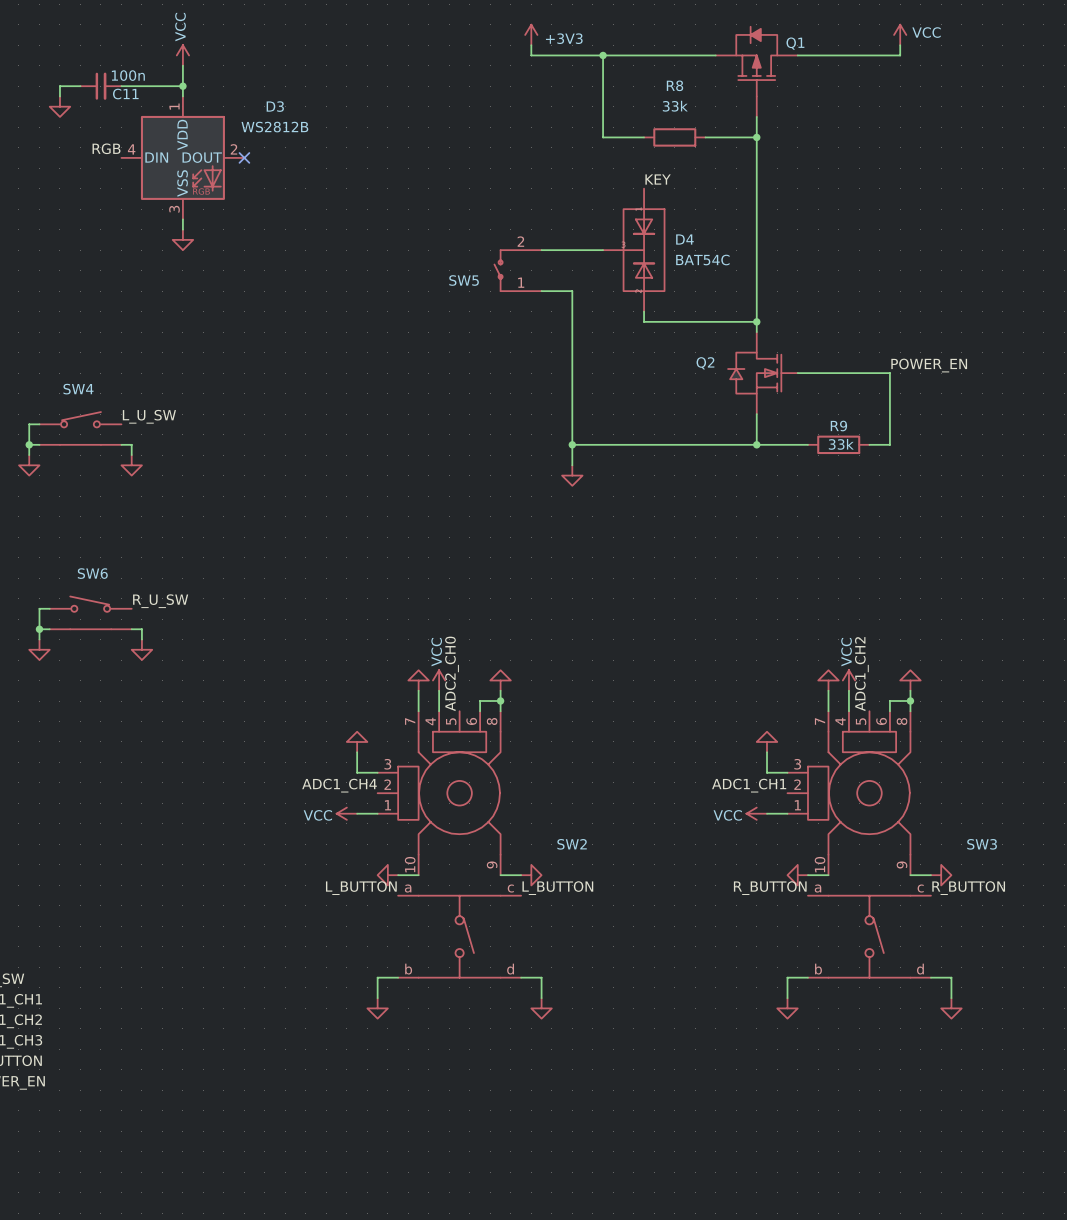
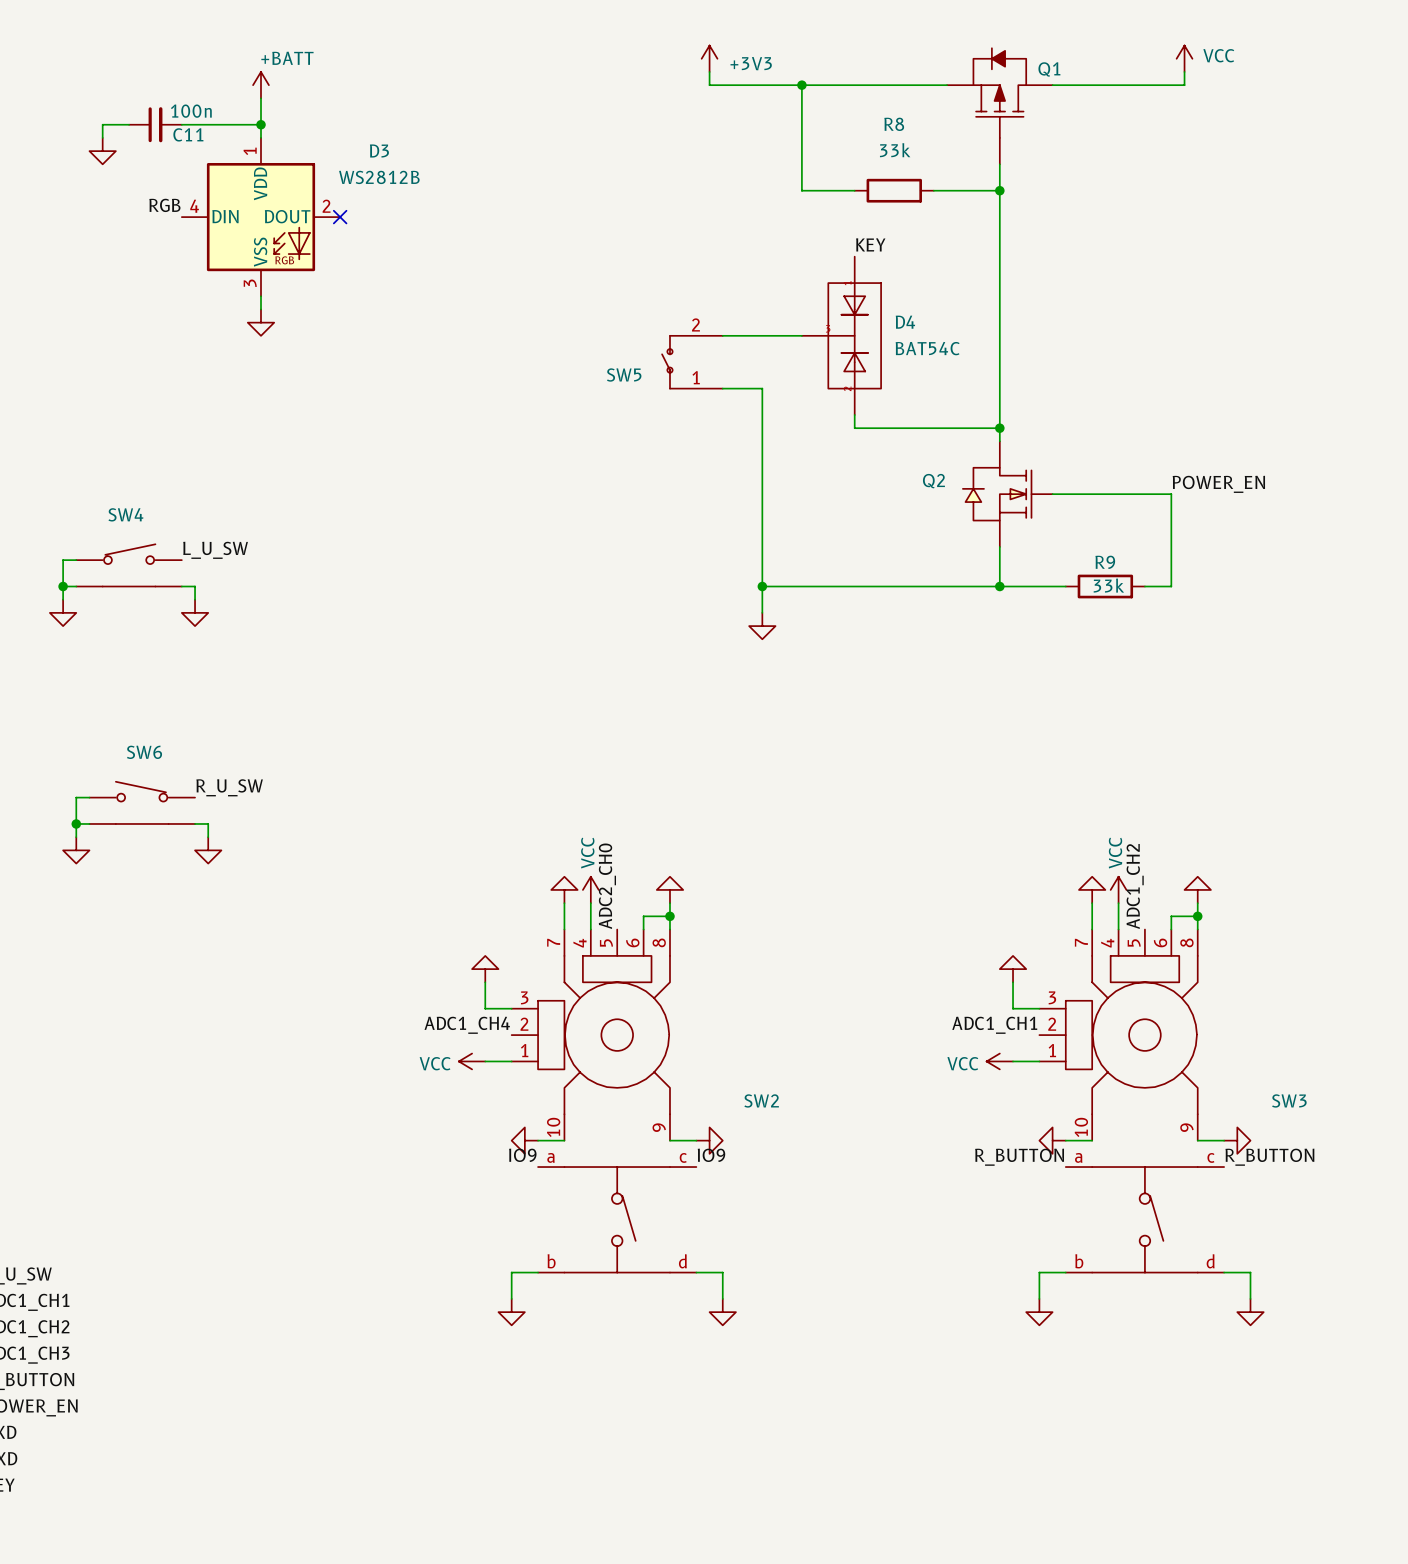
power symbol: VCC (182, 55) -> +BATT (260, 85)
label: L_BUTTON (361, 888) -> IO9 (522, 1155)
label: L_BUTTON (557, 888) -> IO9 (711, 1155)

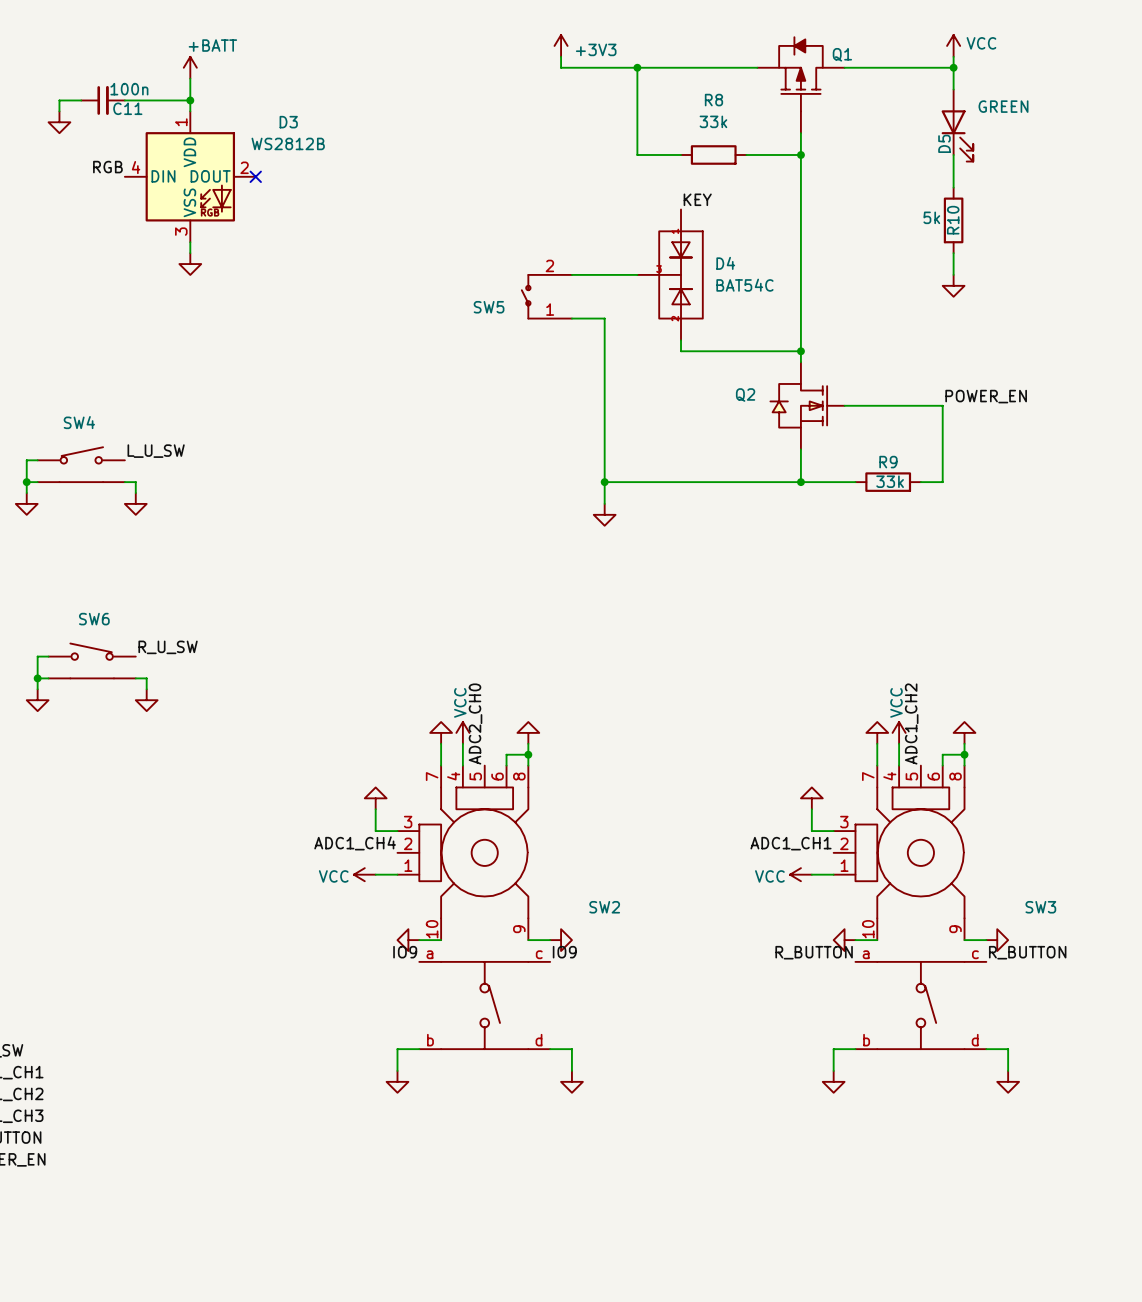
wire: none -> (953, 67) (953, 89)
junction: none -> (953, 67)
D5: none -> GREEN (957, 125)
wire: none -> (953, 154) (953, 187)
R10: none -> 5k (953, 220)
wire: none -> (953, 253) (953, 274)
power symbol: none -> (953, 285)

